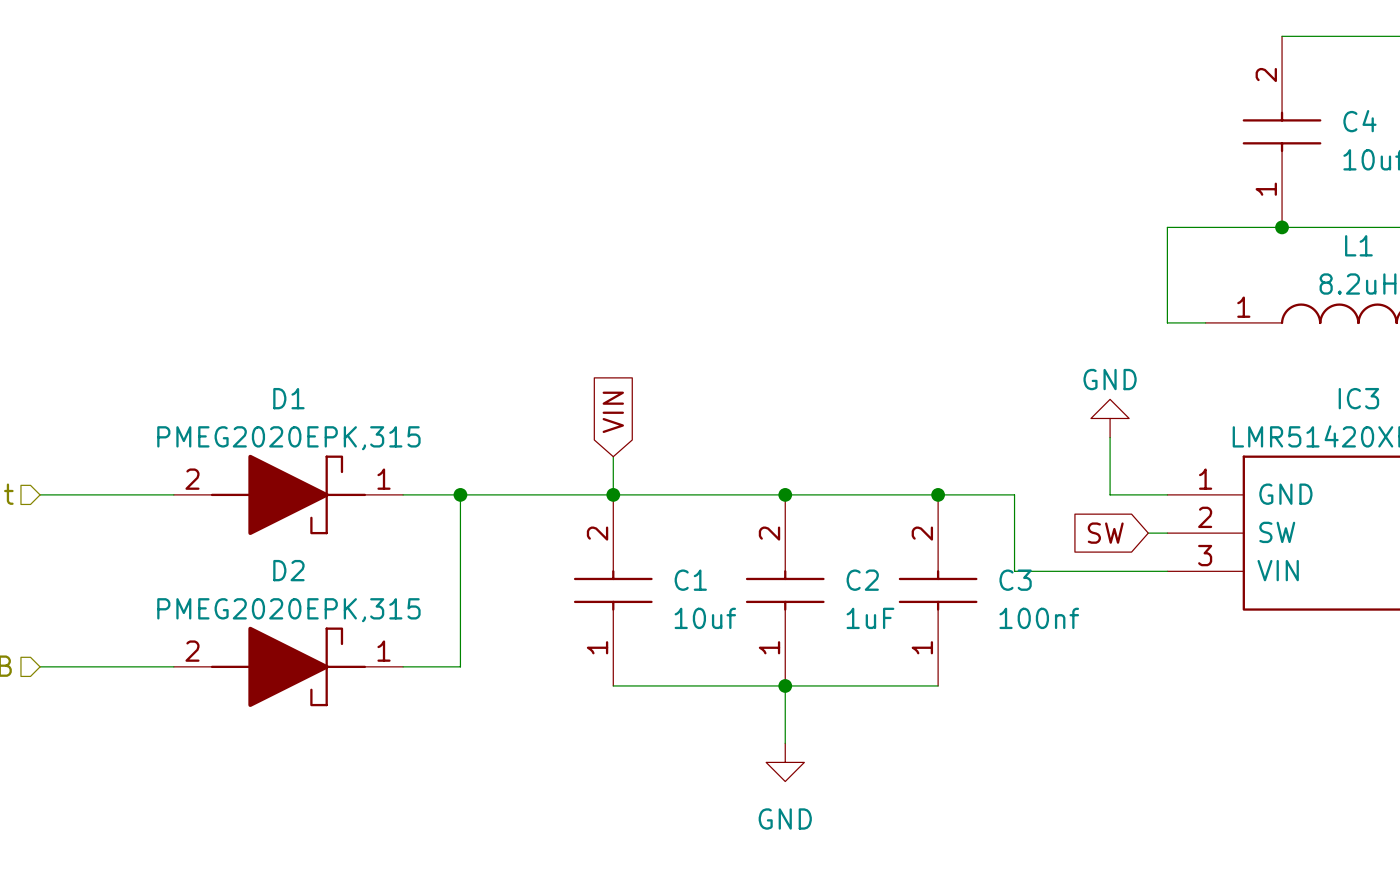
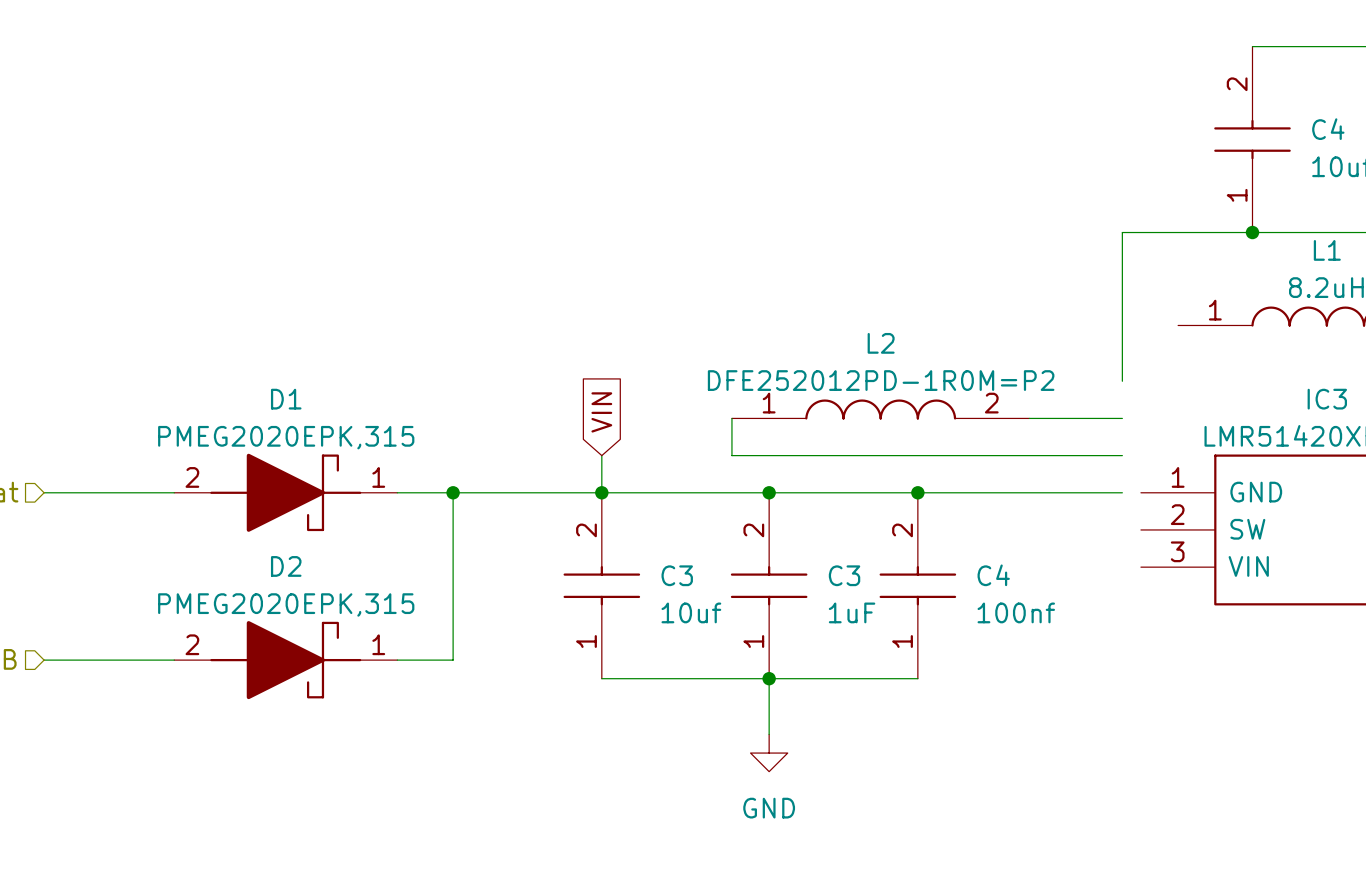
wire: (1167, 227) (1167, 322) (1205, 322) -> (1140, 232) (1122, 232) (1122, 381)
L2: none -> DFE252012PD-1R0M=P2 (880, 409)
wire: none -> (731, 418) (731, 455) (1122, 455)
wire: none -> (1029, 418) (1122, 418)
power symbol: GND (1110, 418) -> none
wire: (1110, 437) (1110, 494) -> none
wire: (1014, 494) (1014, 571) (1167, 571) -> (992, 492) (1085, 492)
wire: (1148, 494) (1167, 494) -> none
global label: SW (1105, 533) -> none
wire: (1148, 533) (1167, 533) -> none
C1 name: C1 (690, 580) -> C3 (677, 575)
C2 name: C2 (862, 580) -> C3 (844, 575)
C3 name: C3 (1015, 580) -> C4 (993, 575)

